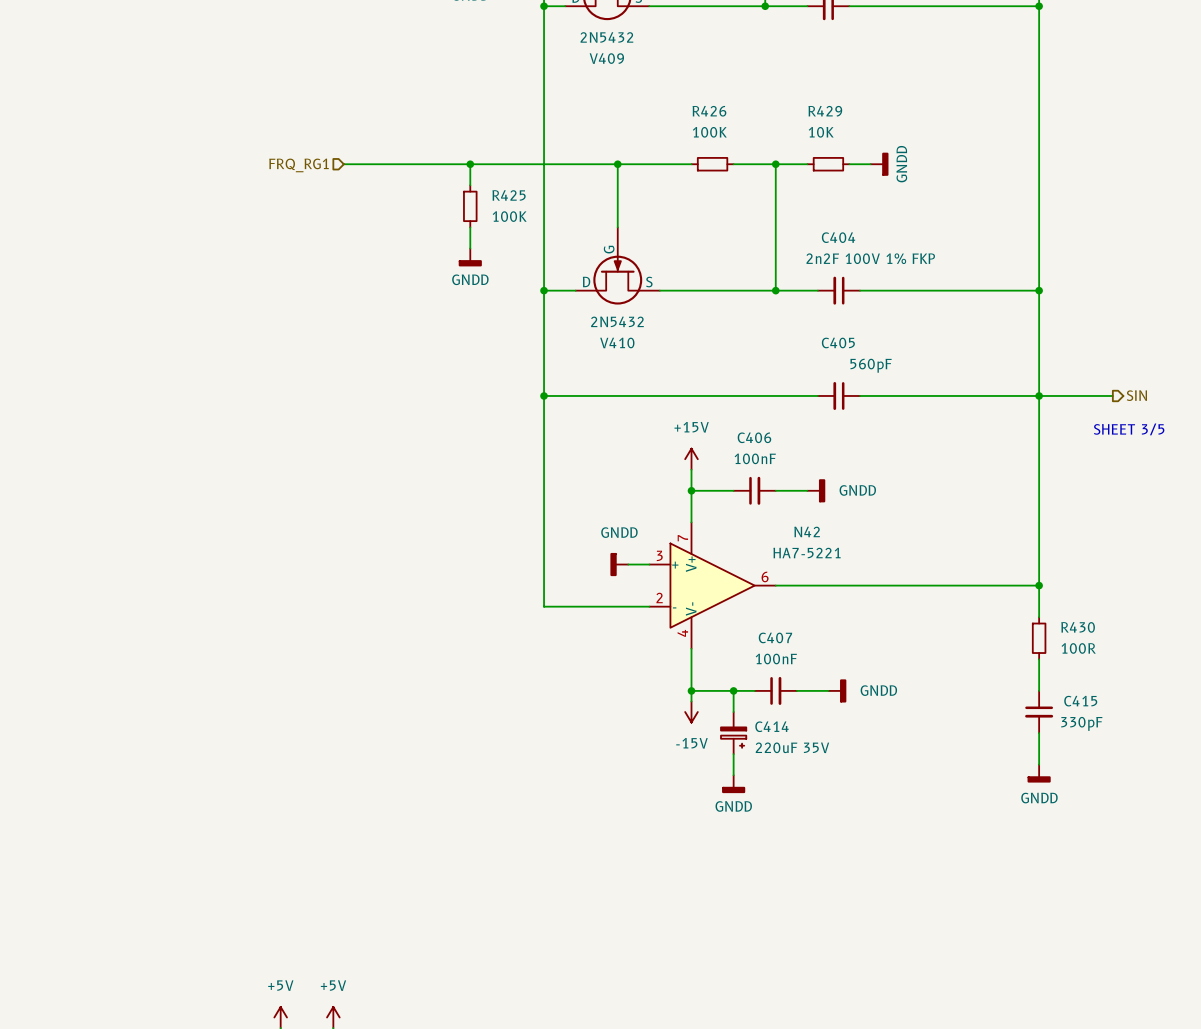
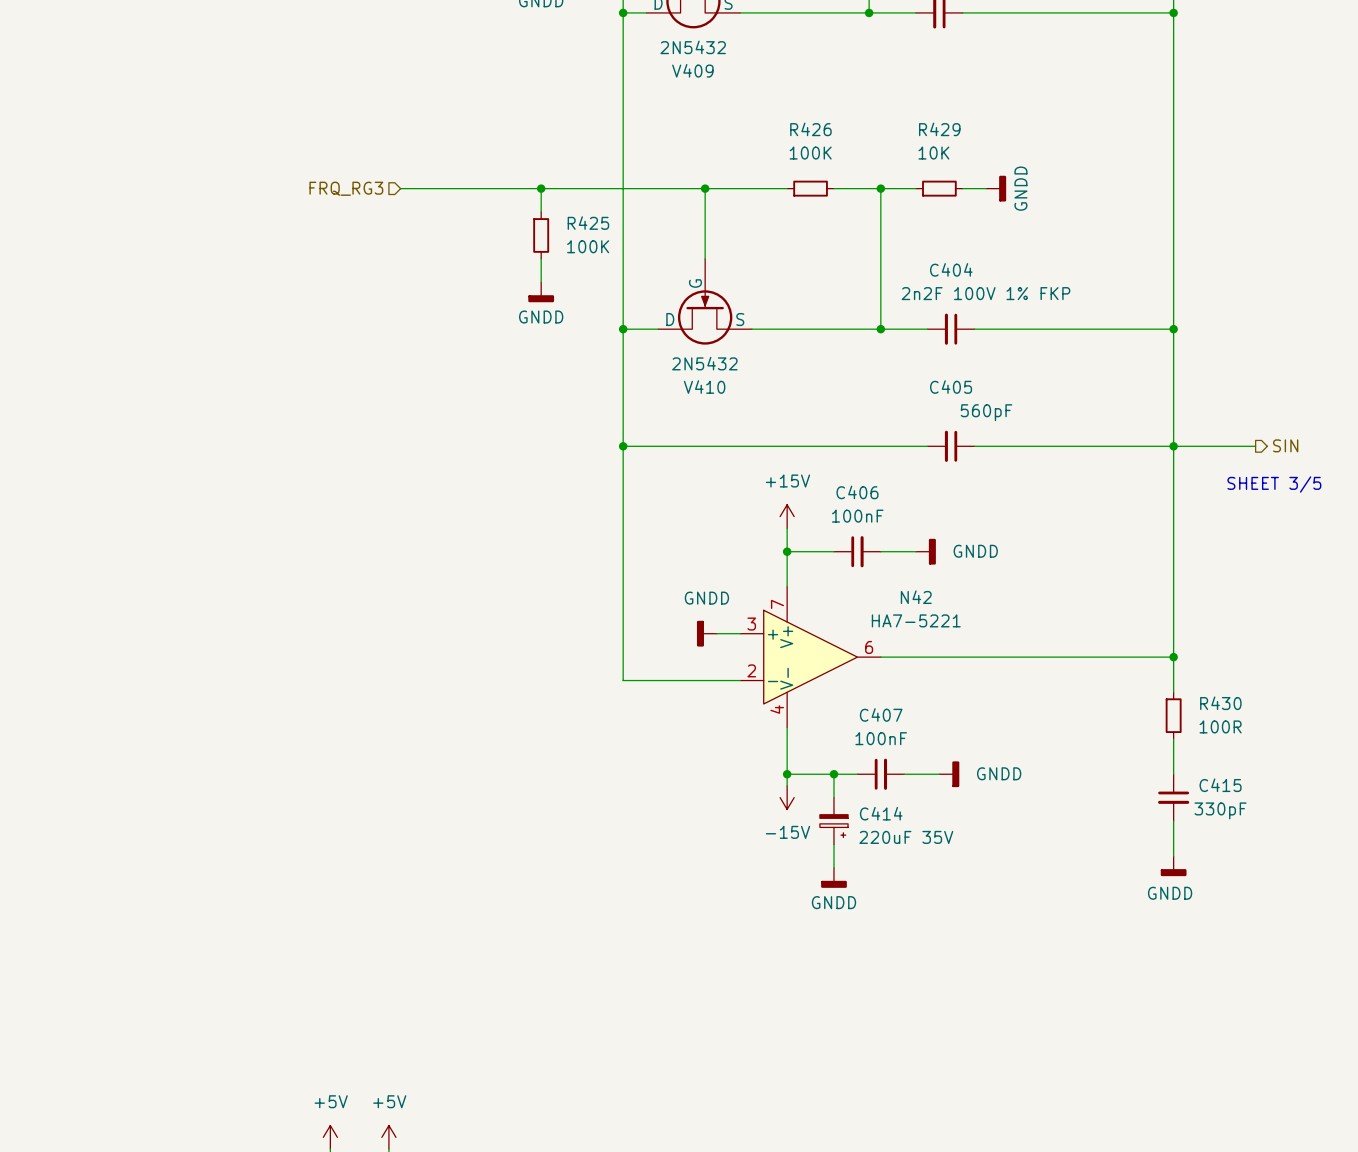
hierarchical label: FRQ_RG1 (299, 165) -> FRQ_RG3 (346, 188)

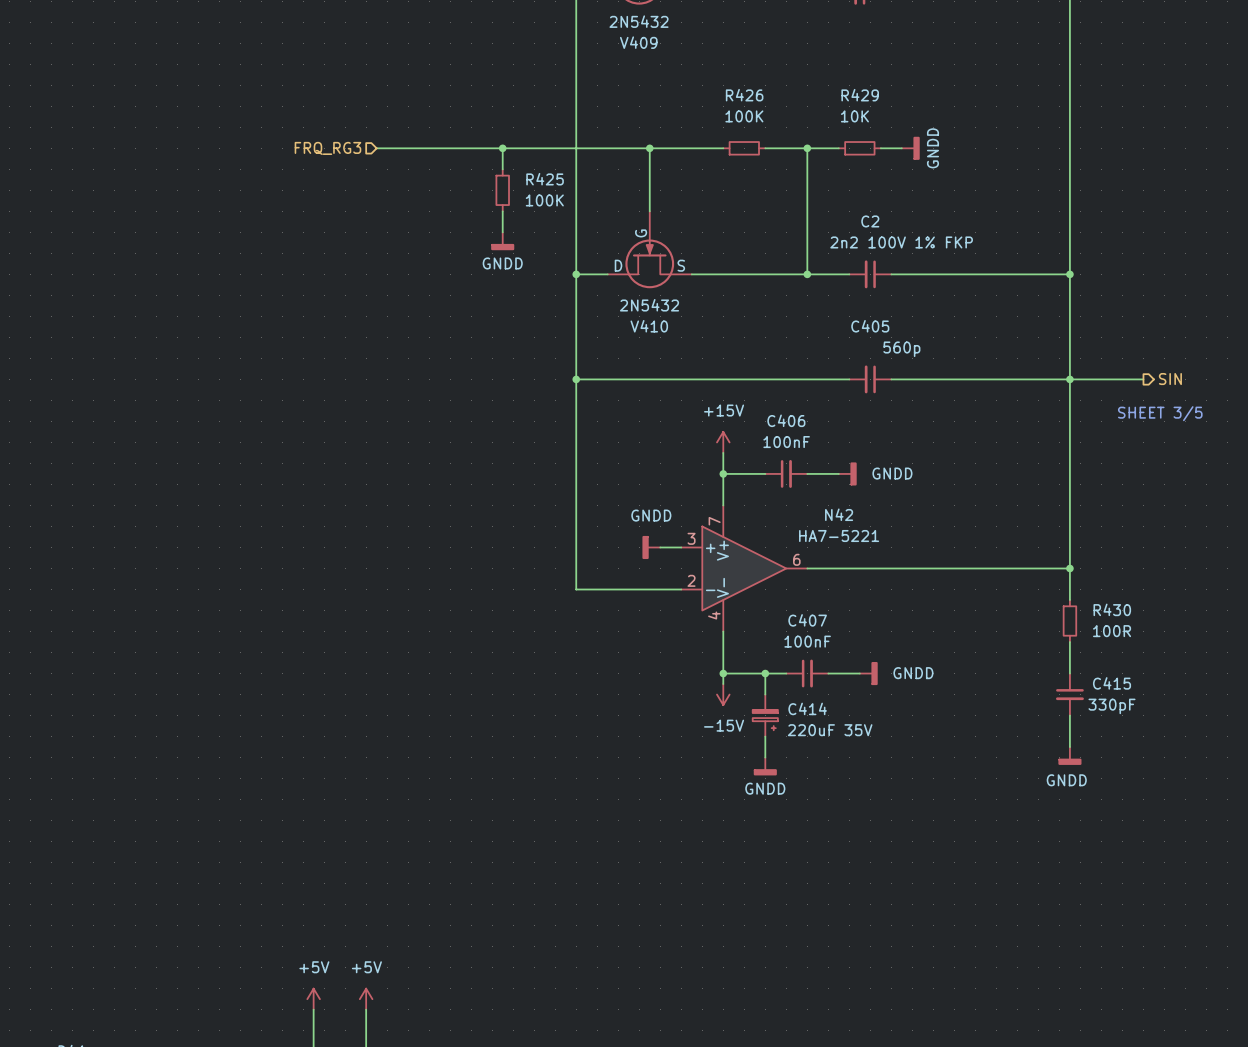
C404 name: C404 (951, 269) -> C2 (870, 221)
C404 value: 2n2F 100V 1% FKP (985, 293) -> 2n2 100V 1% FKP (901, 242)
C405 value: 560pF (986, 412) -> 560p (901, 349)

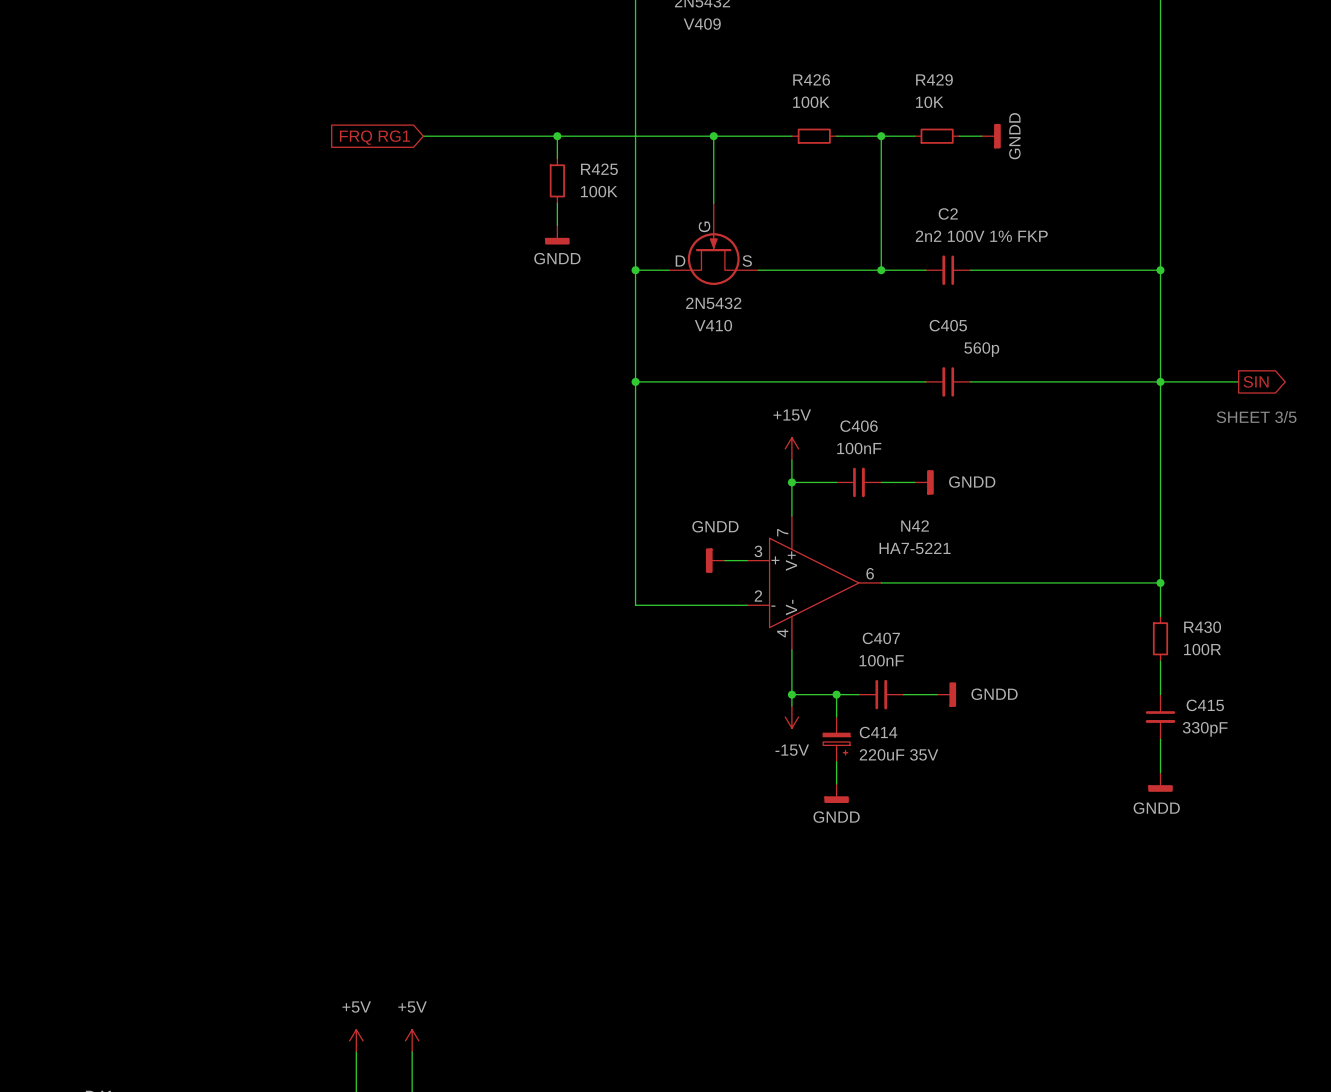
hierarchical label: FRQ_RG3 (327, 148) -> none
global label: none -> FRQ RG1 (374, 137)
global label: none -> SIN (1256, 381)
hierarchical label: SIN (1170, 379) -> none

